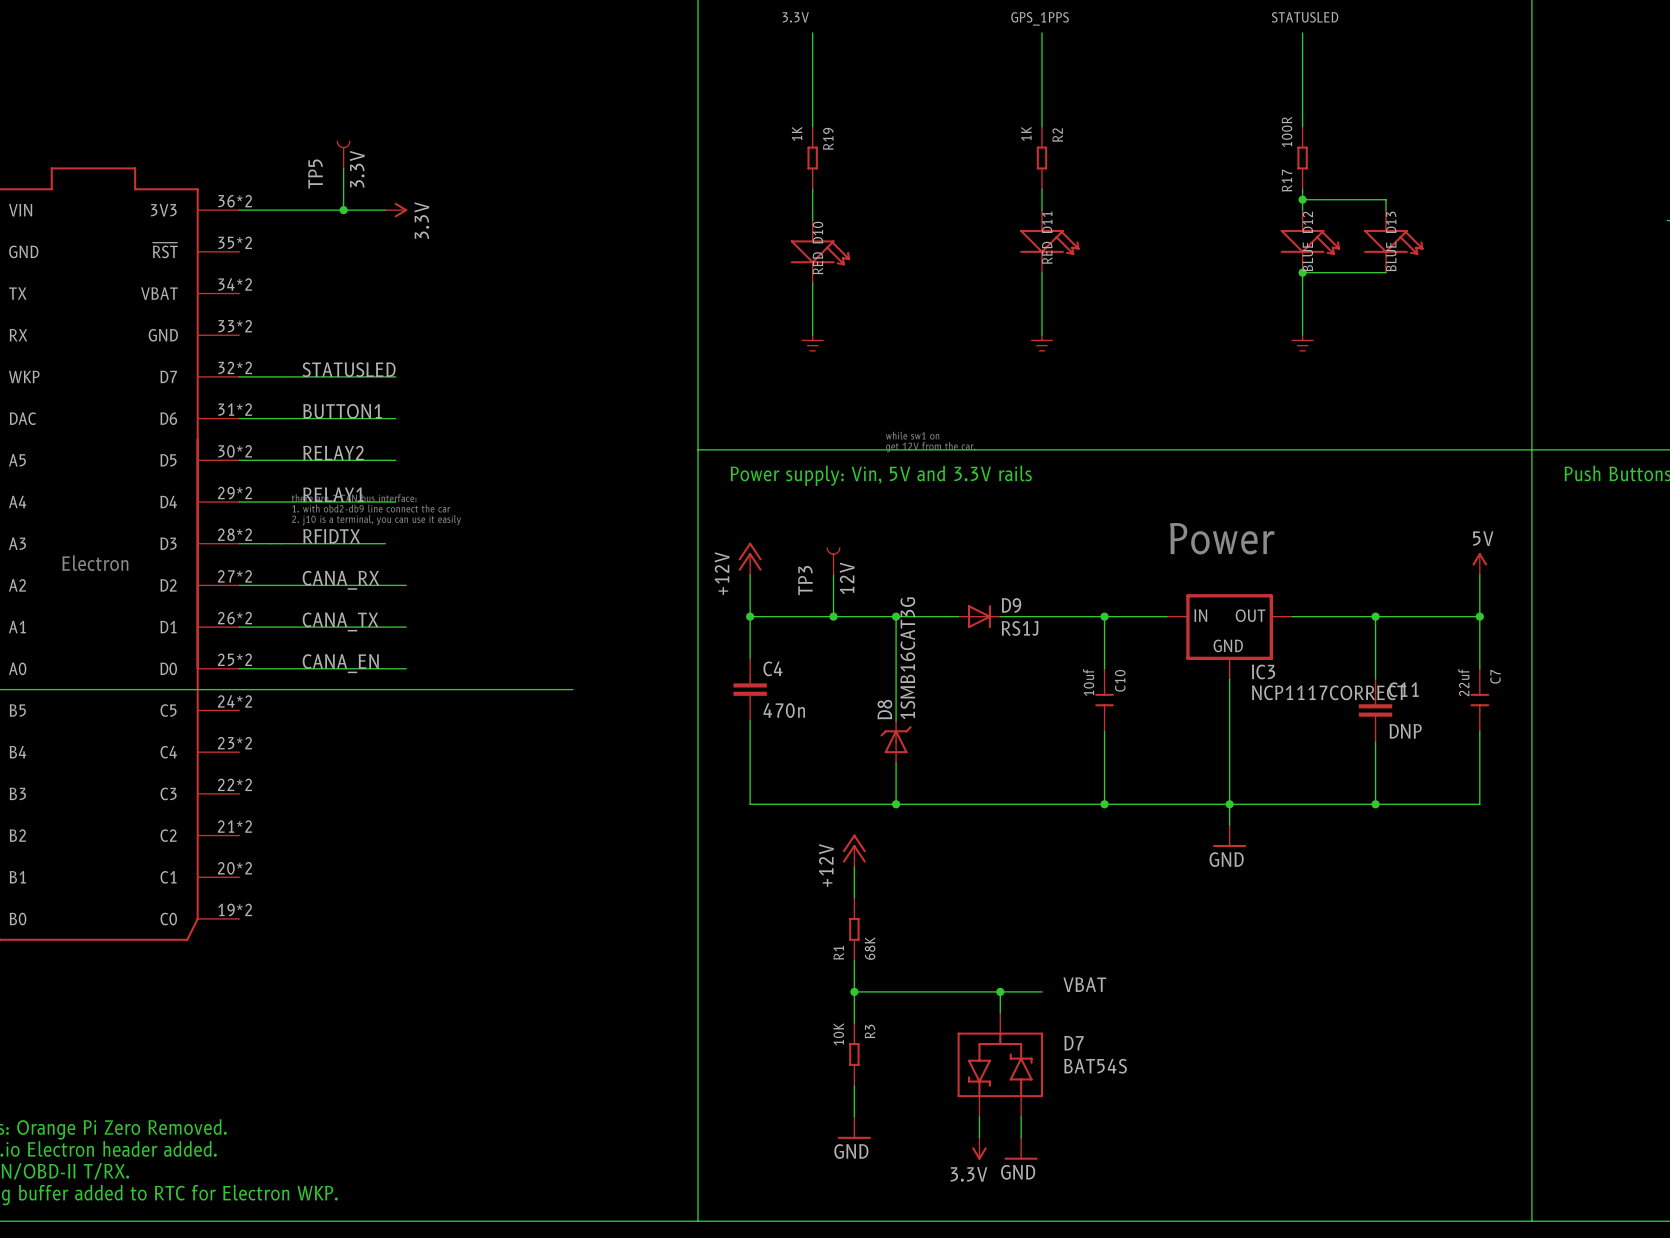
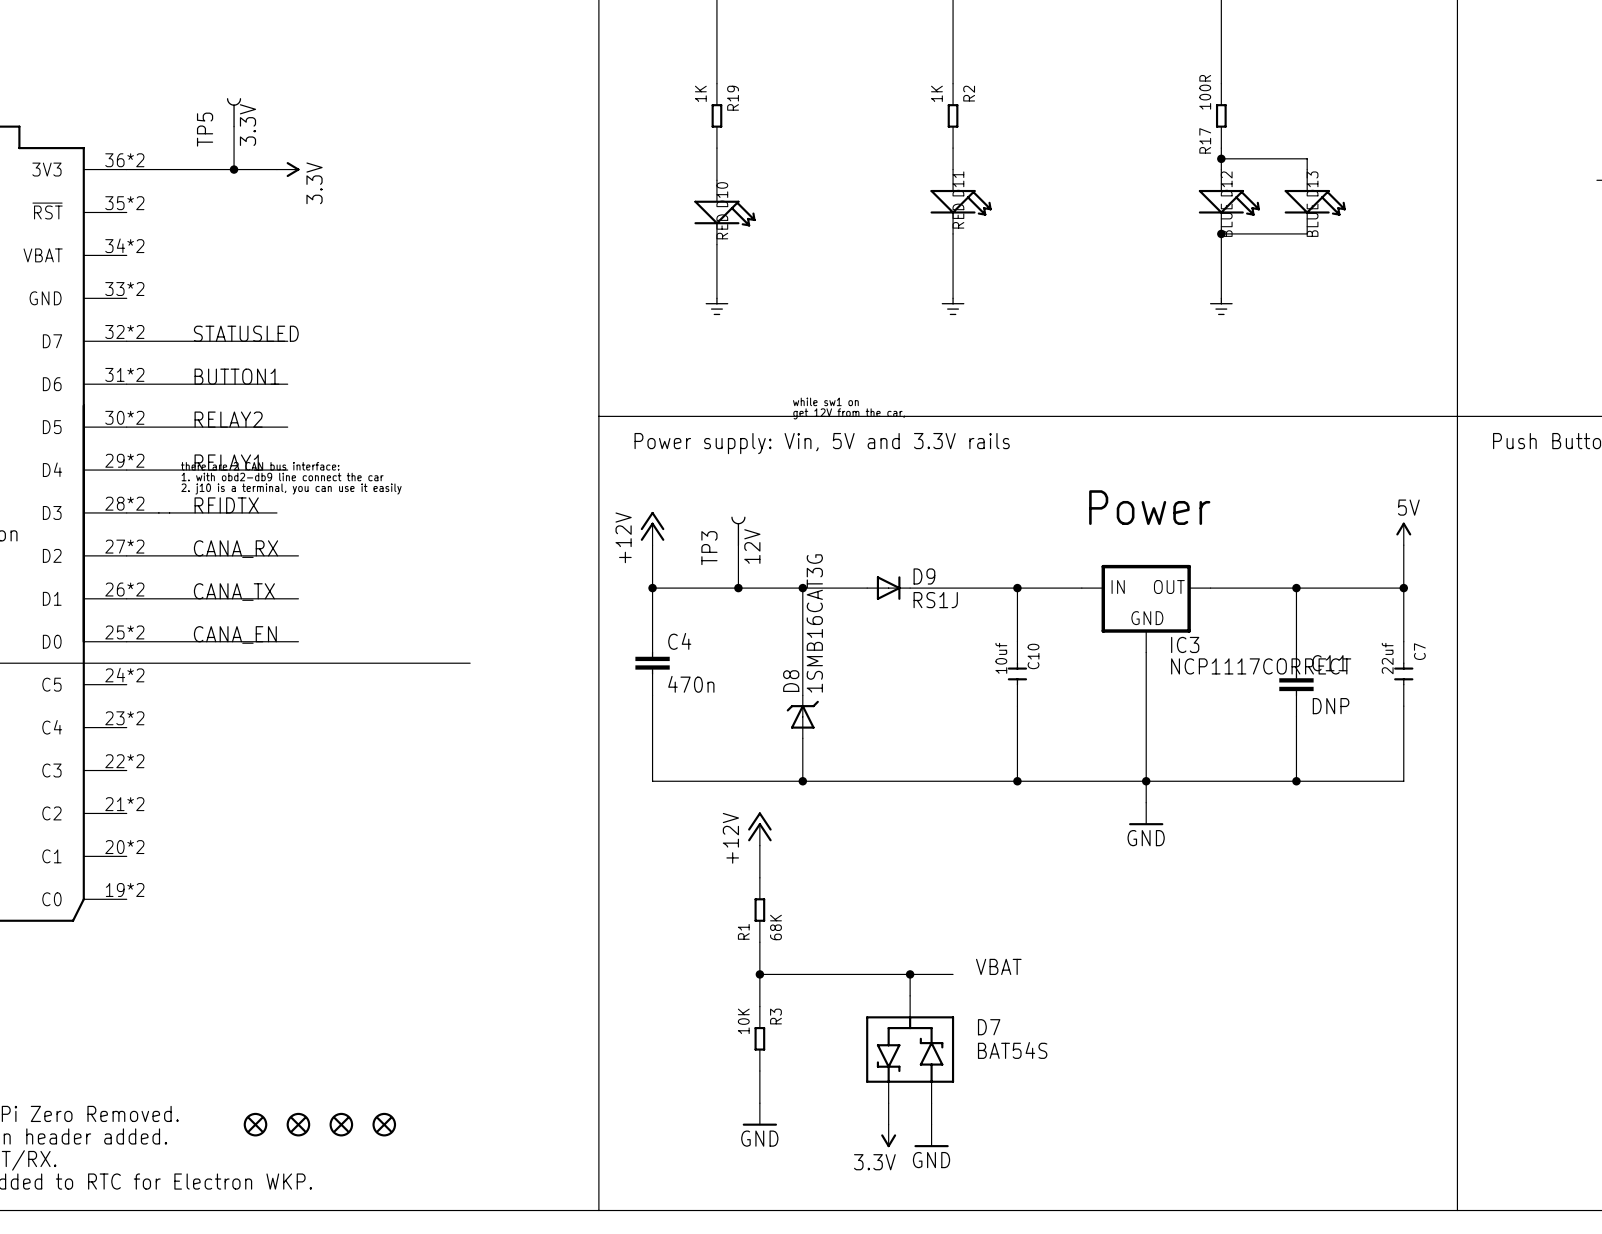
part: none -> (255, 1124)
part: none -> (298, 1124)
part: none -> (341, 1124)
part: none -> (384, 1124)

